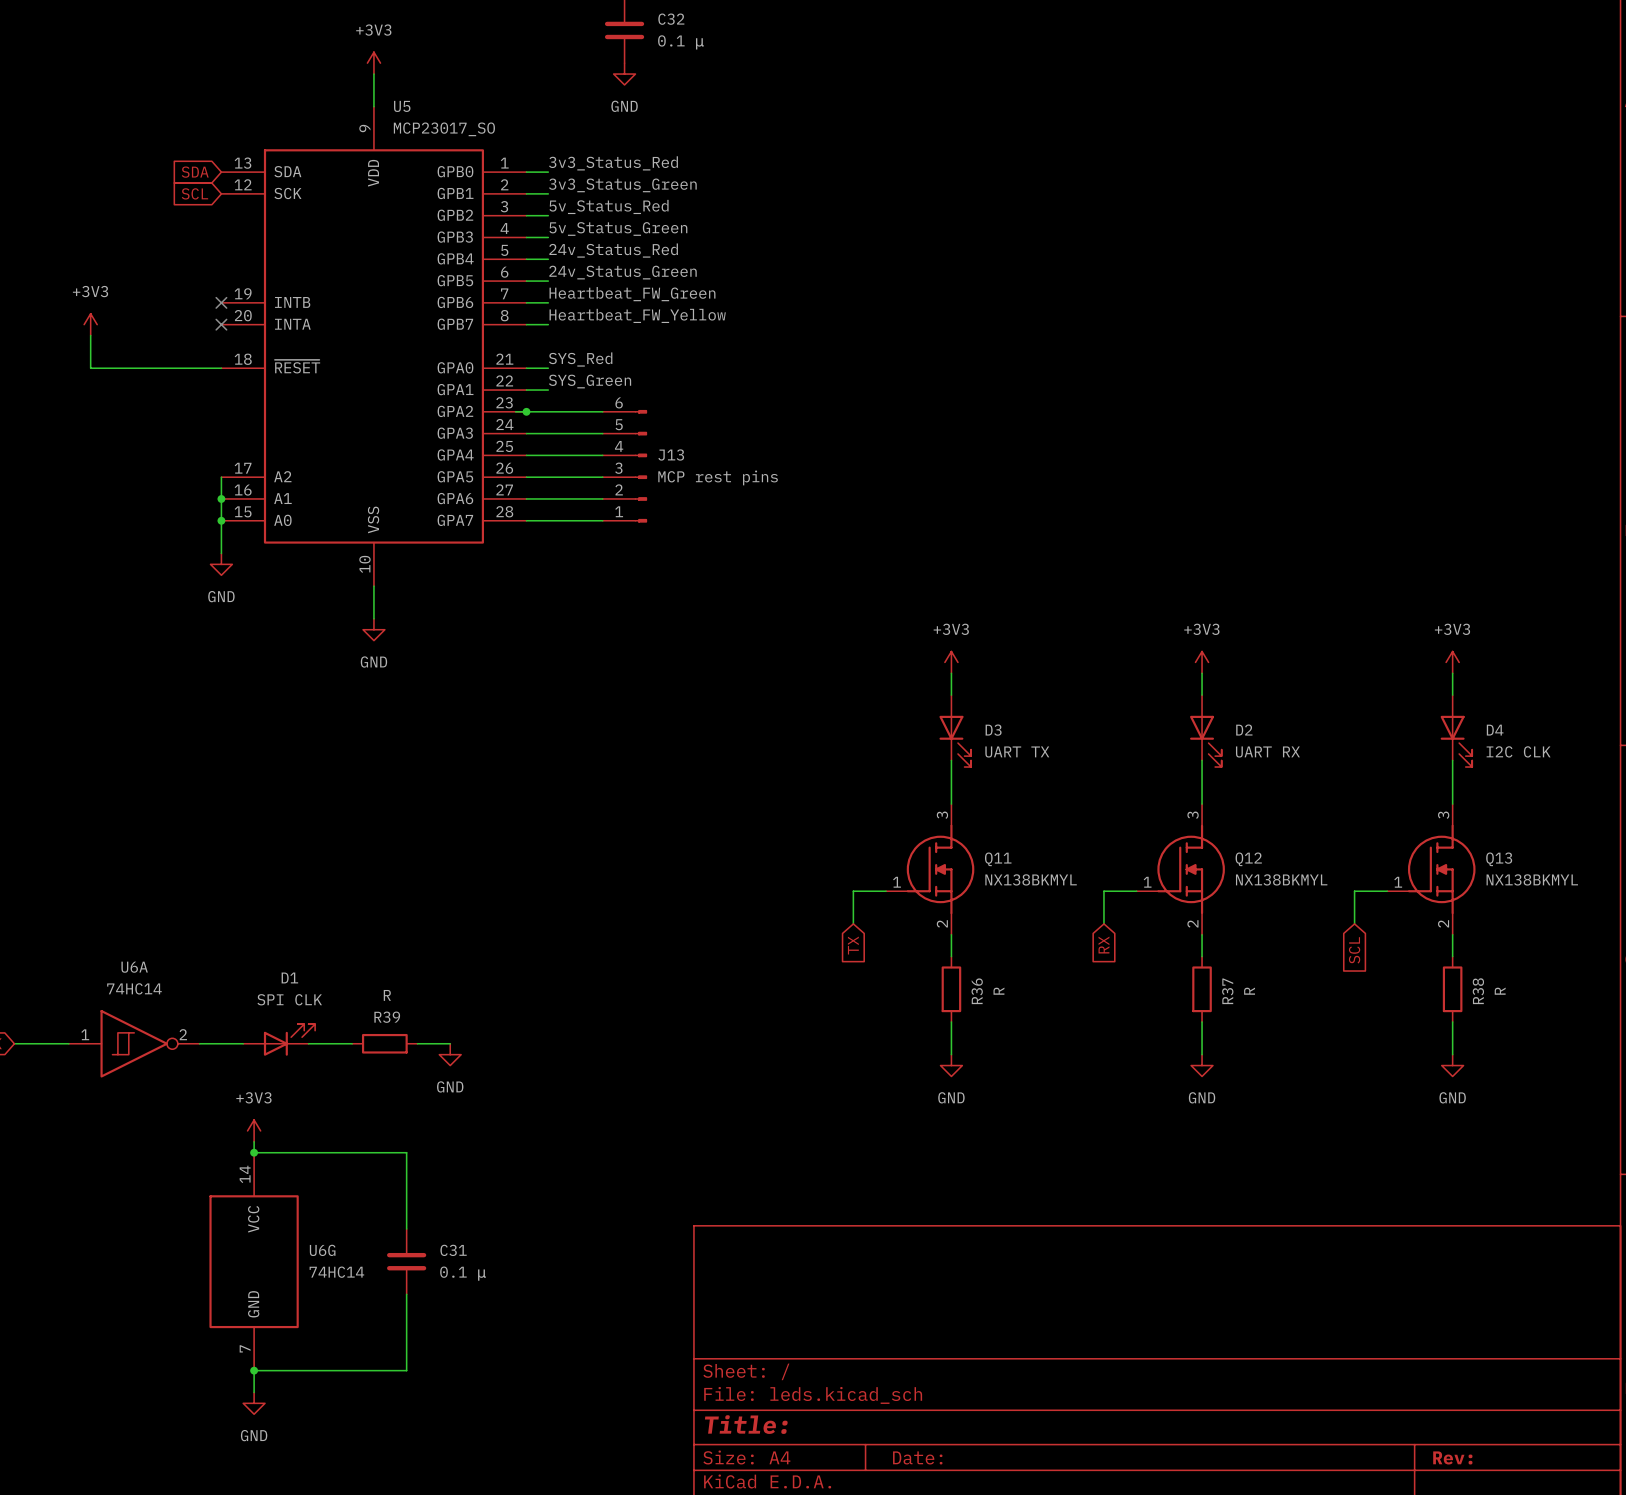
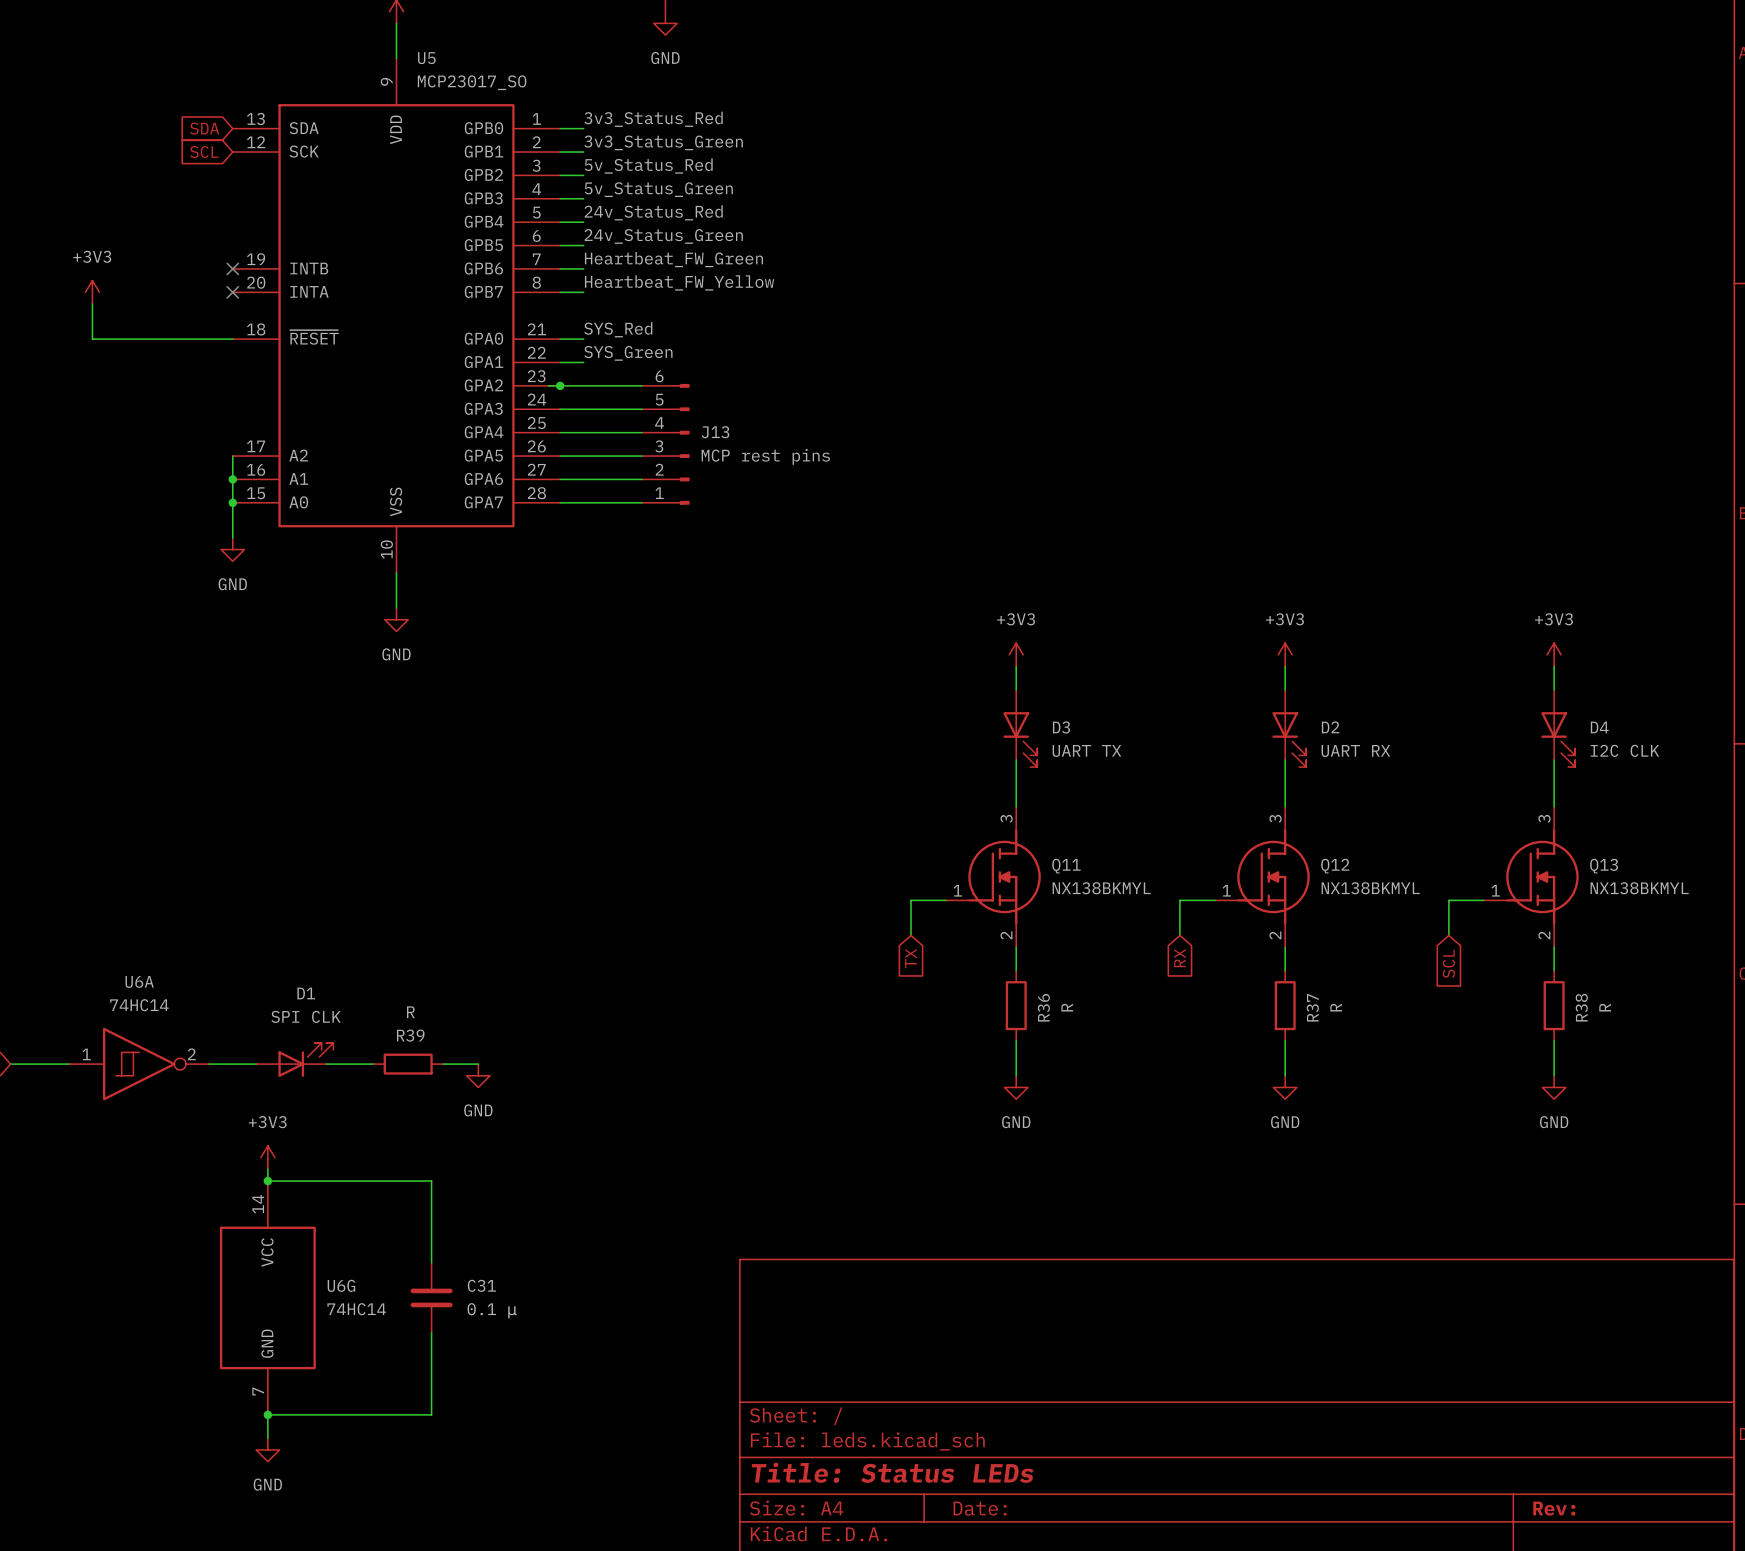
title block: Title: (746, 1424) -> Title: Status LEDs (892, 1472)

